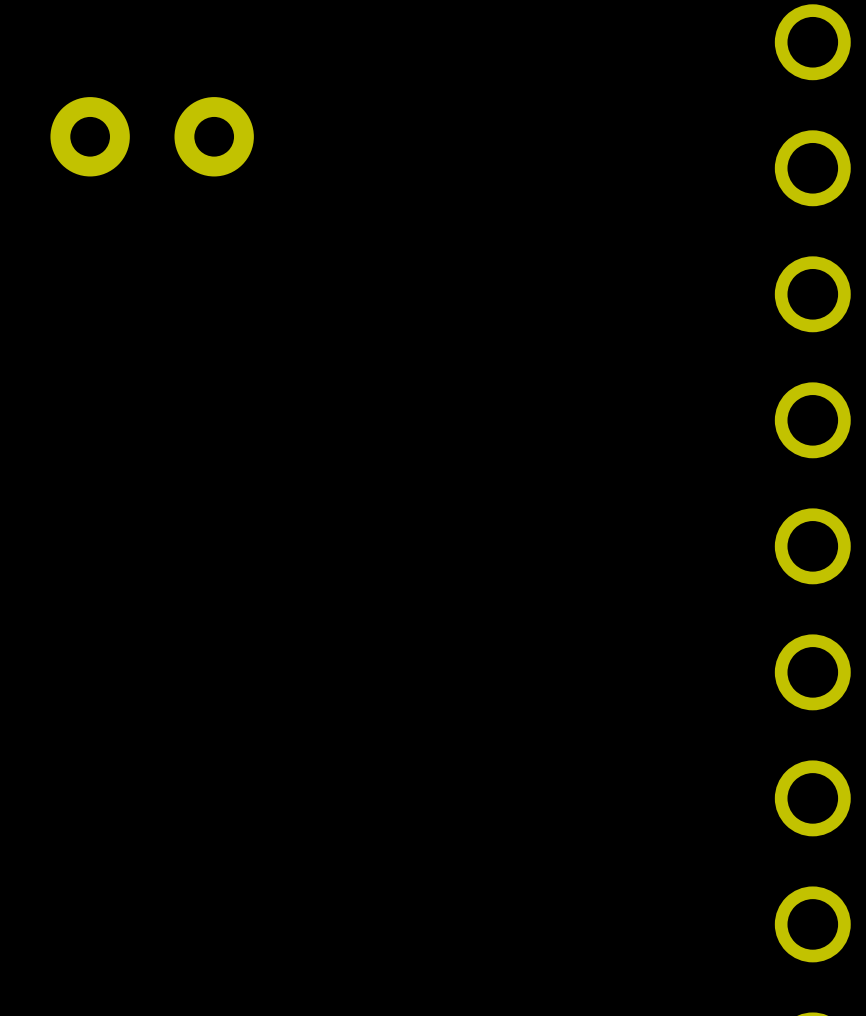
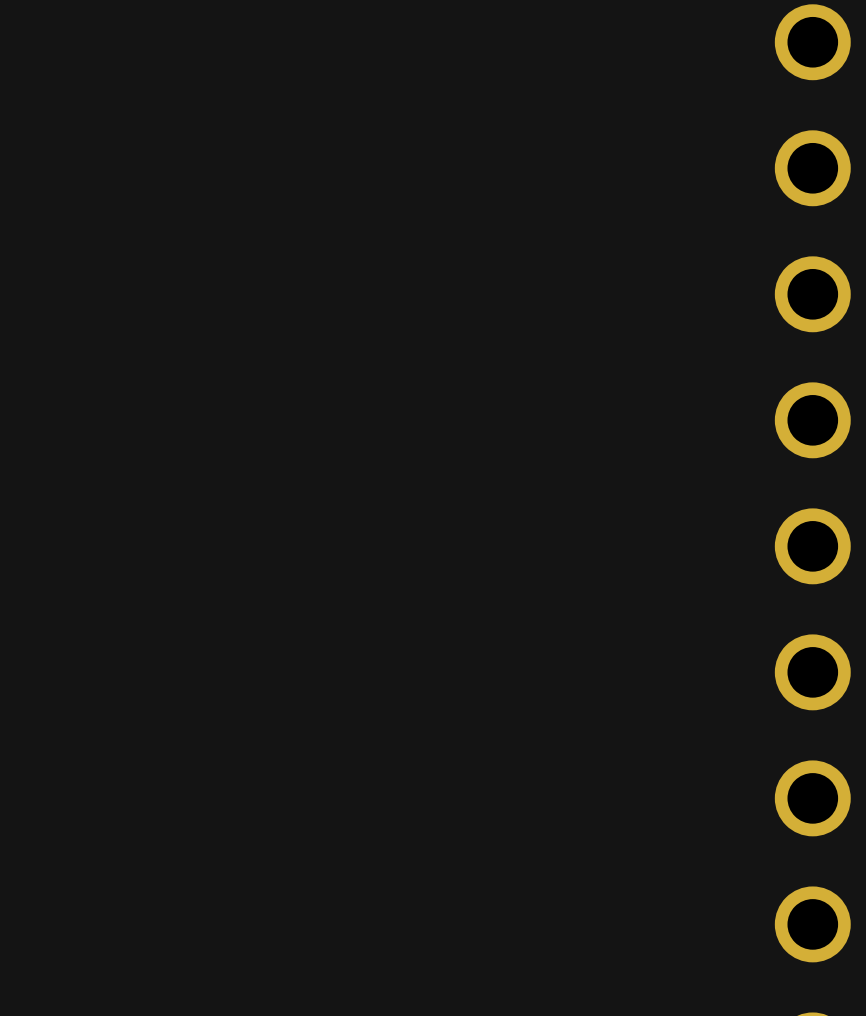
part: (152, 136) -> none

